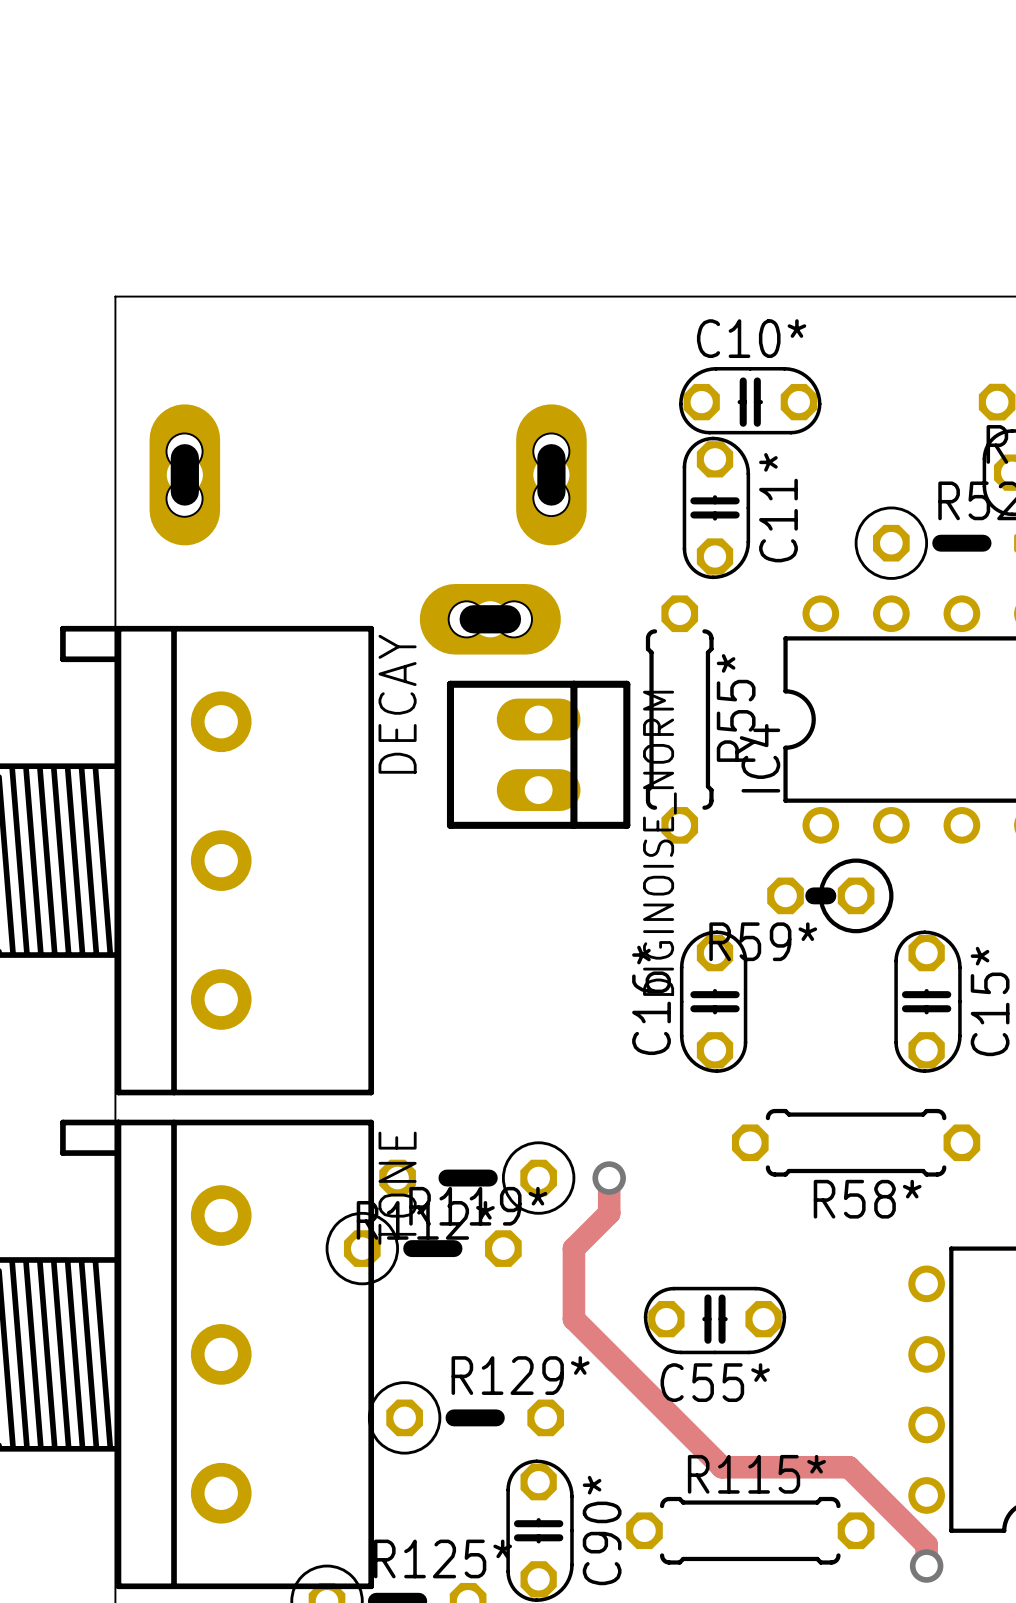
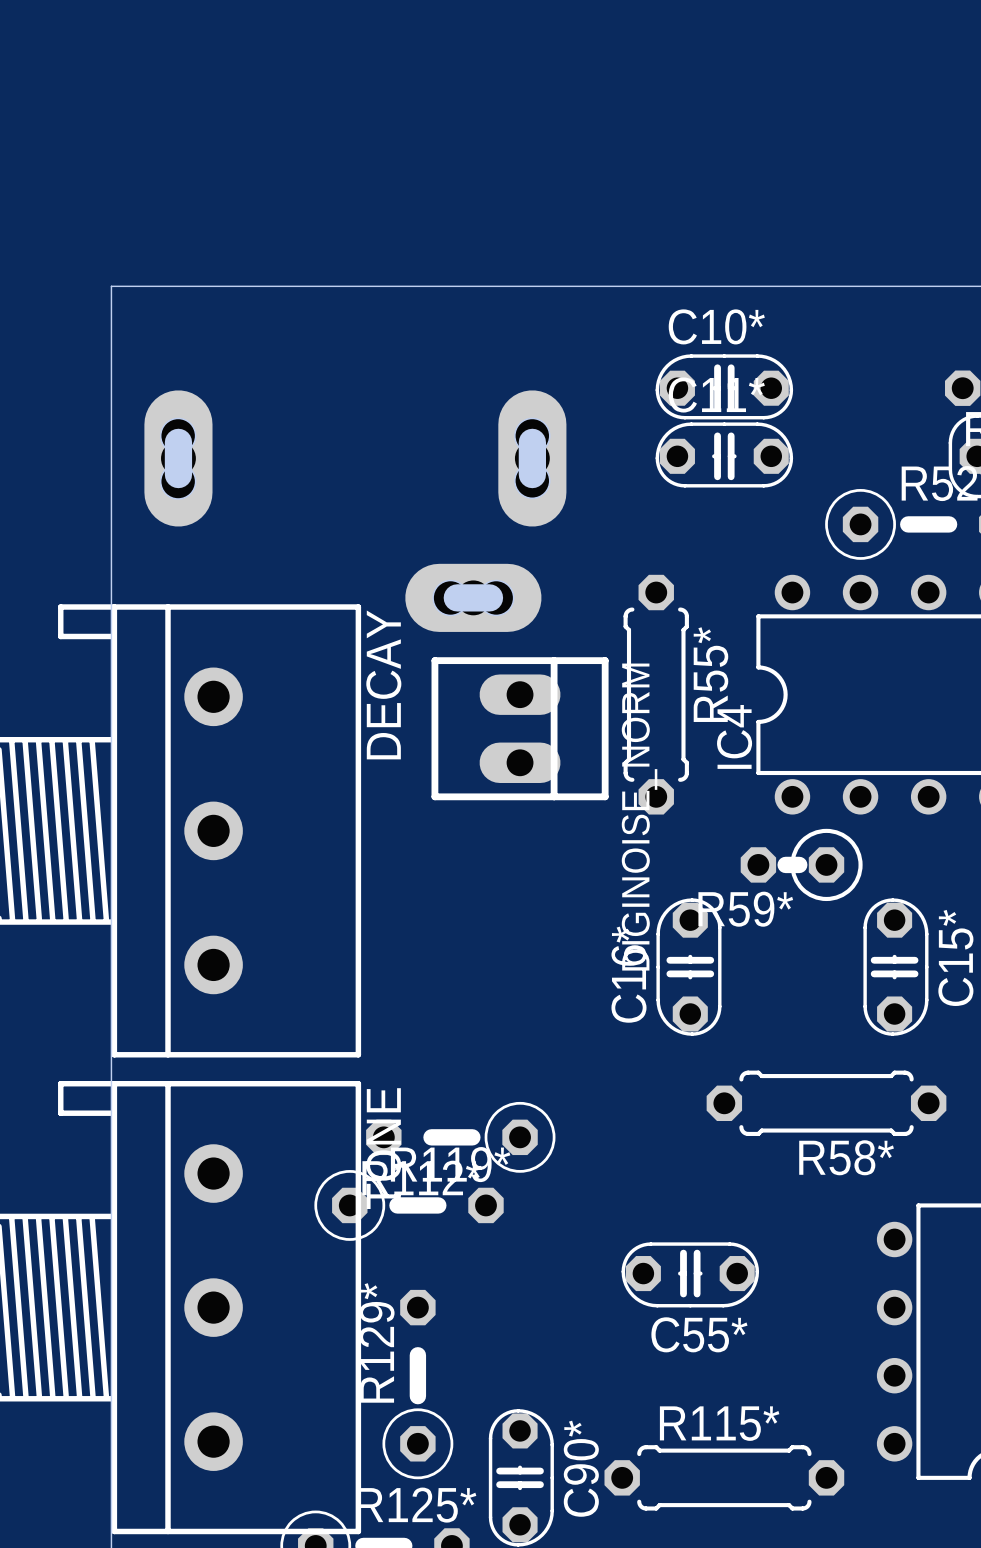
C11* rotation: 0° (716, 507) -> 90° counterclockwise (724, 454)
track: (609, 1178) (609, 1213) (573, 1248) (573, 1319) (722, 1467) (849, 1467) (926, 1544) (926, 1566) -> none
via: (609, 1178) -> none
R129* rotation: 0° (466, 1417) -> 90° counterclockwise (417, 1384)
via: (926, 1566) -> none

